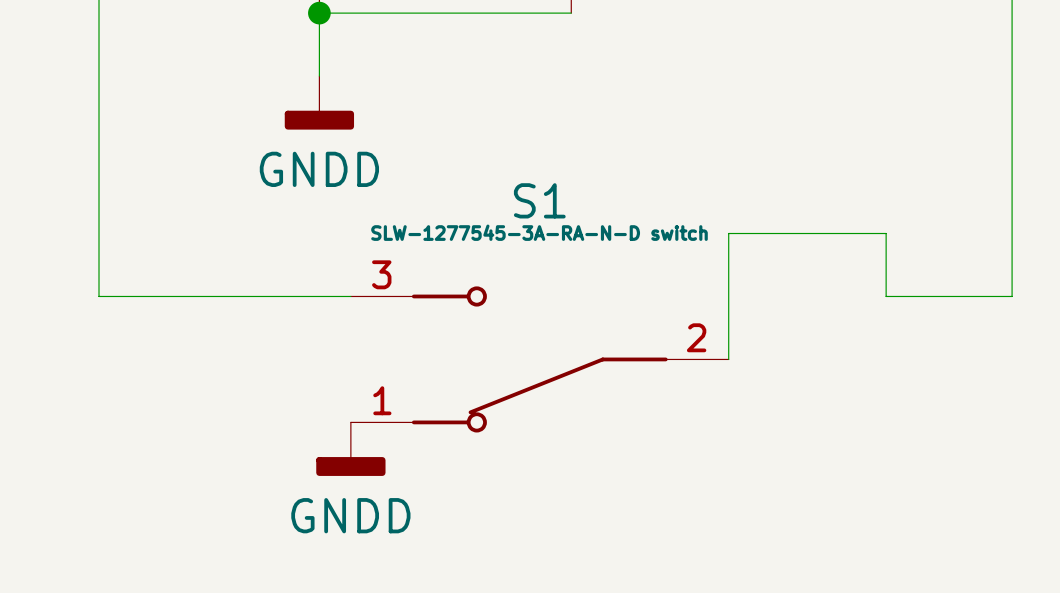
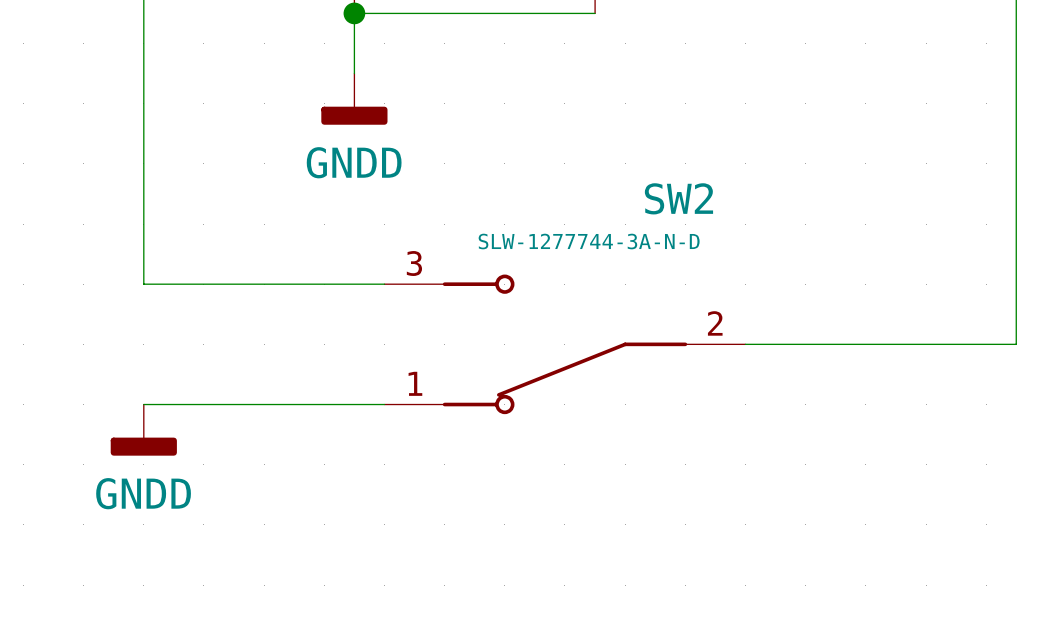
S1 name: S1 (539, 200) -> SW2 (678, 198)
S1 value: SLW-1277545-3A-RA-N-D switch (539, 232) -> SLW-1277744-3A-N-D (589, 241)
wire: (1012, 296) (886, 296) (886, 233) (728, 233) (728, 359) -> (1016, 284) (1016, 344) (745, 344)
wire: none -> (143, 404) (384, 404)
power symbol position: GNDD (350, 449) -> GNDD (143, 430)

